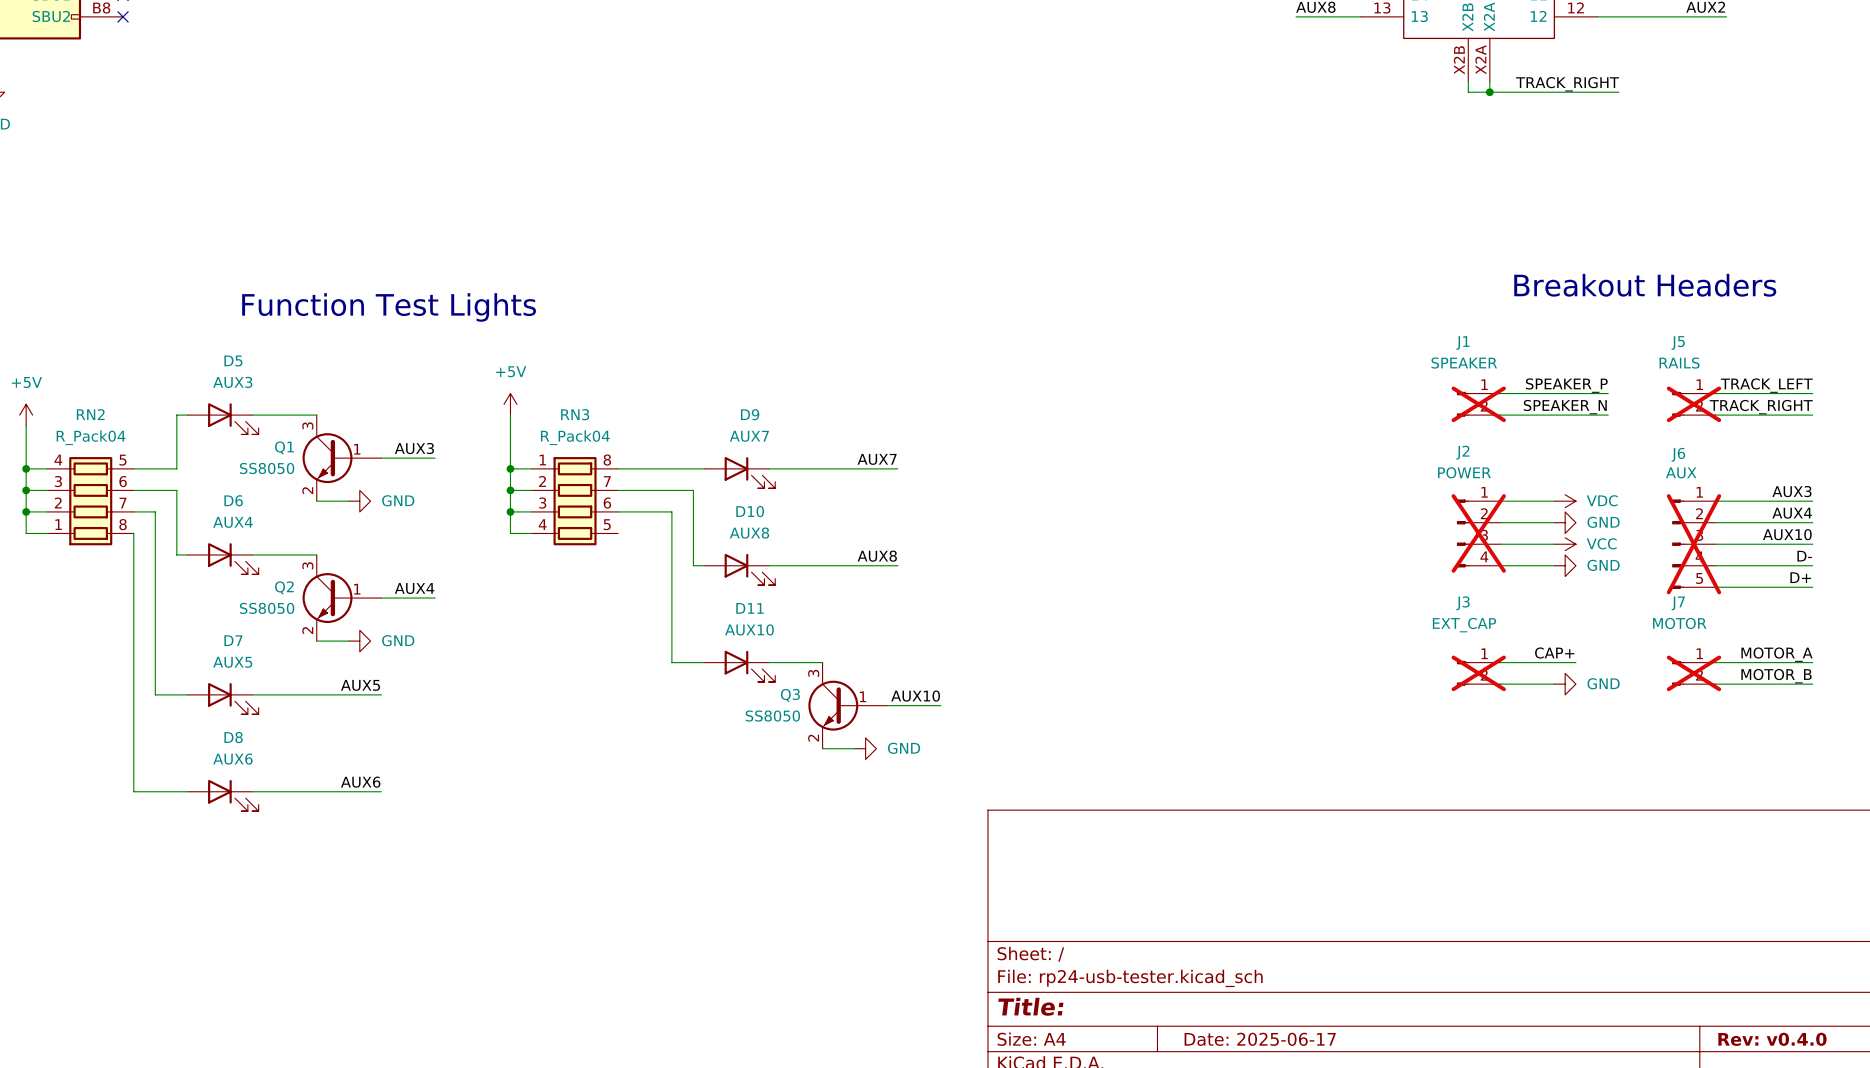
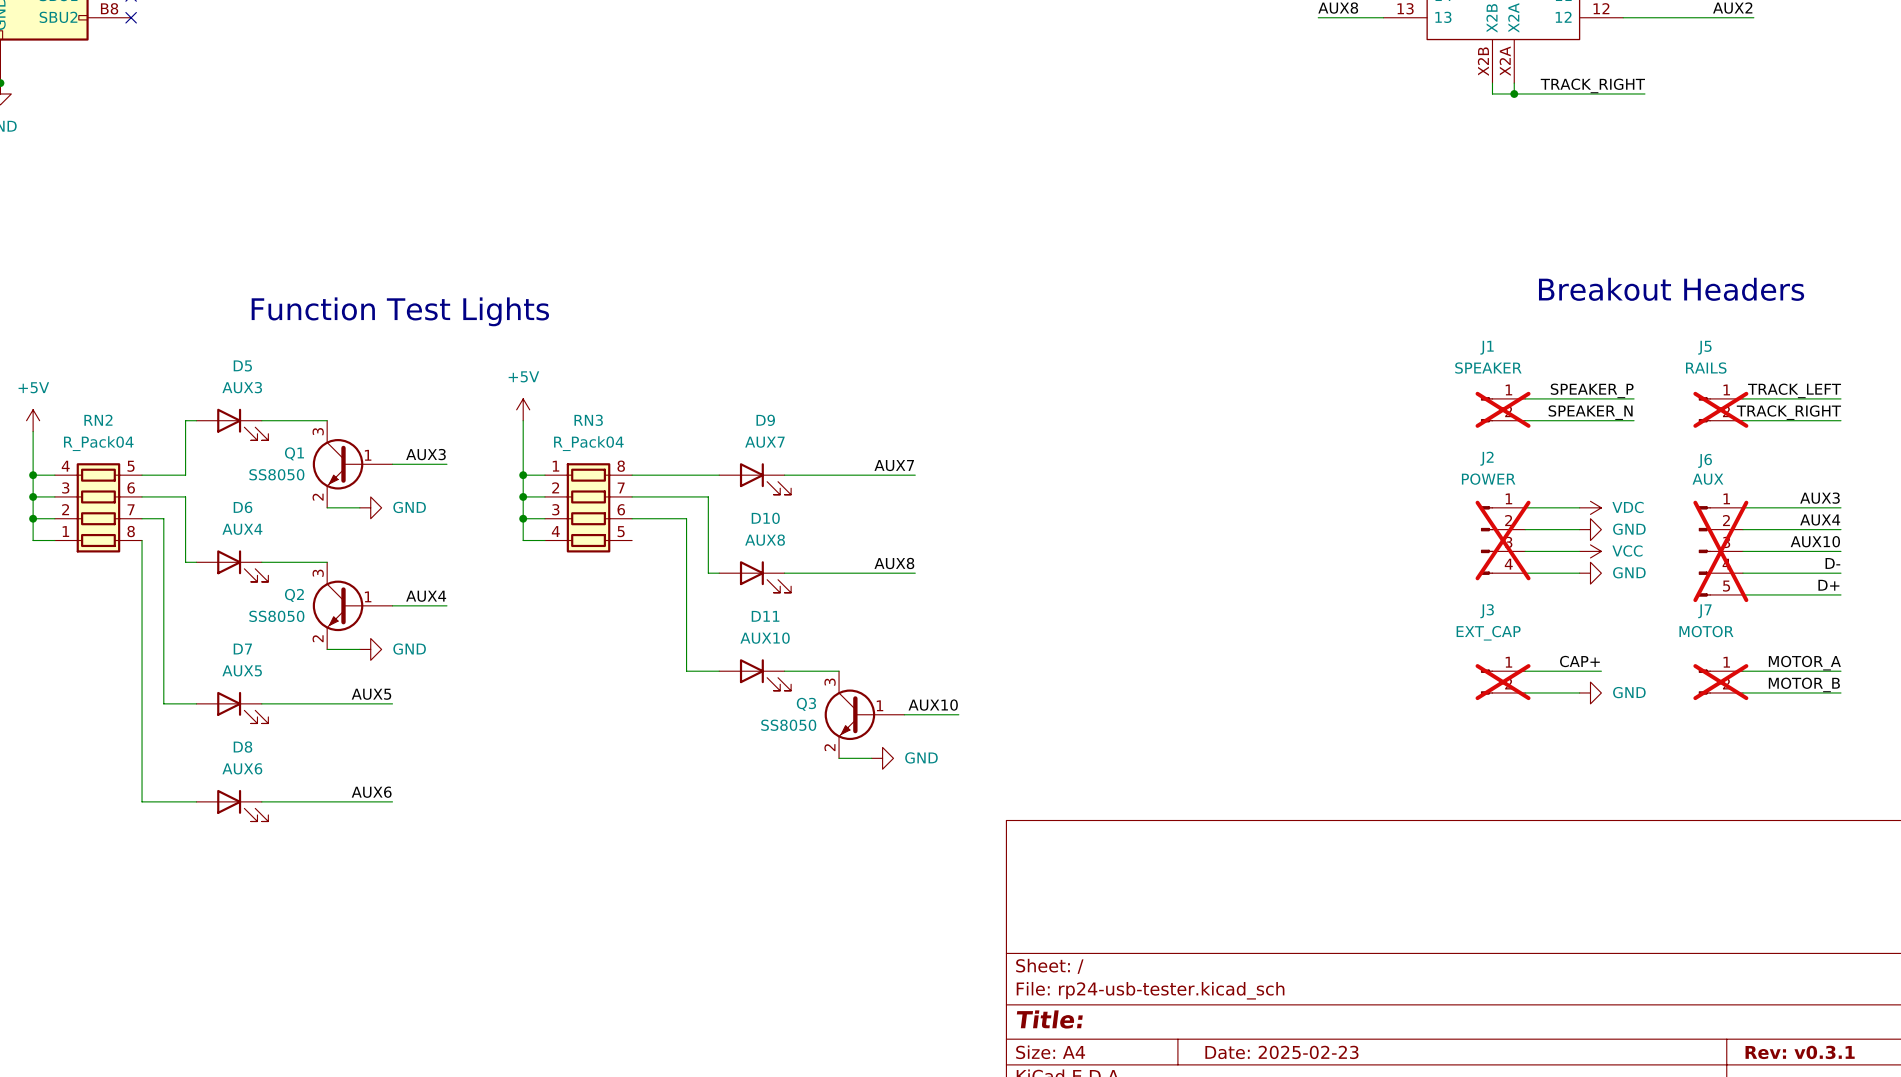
title block: Date: 2025-06-17 (1260, 1039) -> Date: 2025-02-23 (1281, 1052)
title block: Rev: v0.4.0 (1772, 1039) -> Rev: v0.3.1 (1800, 1052)

